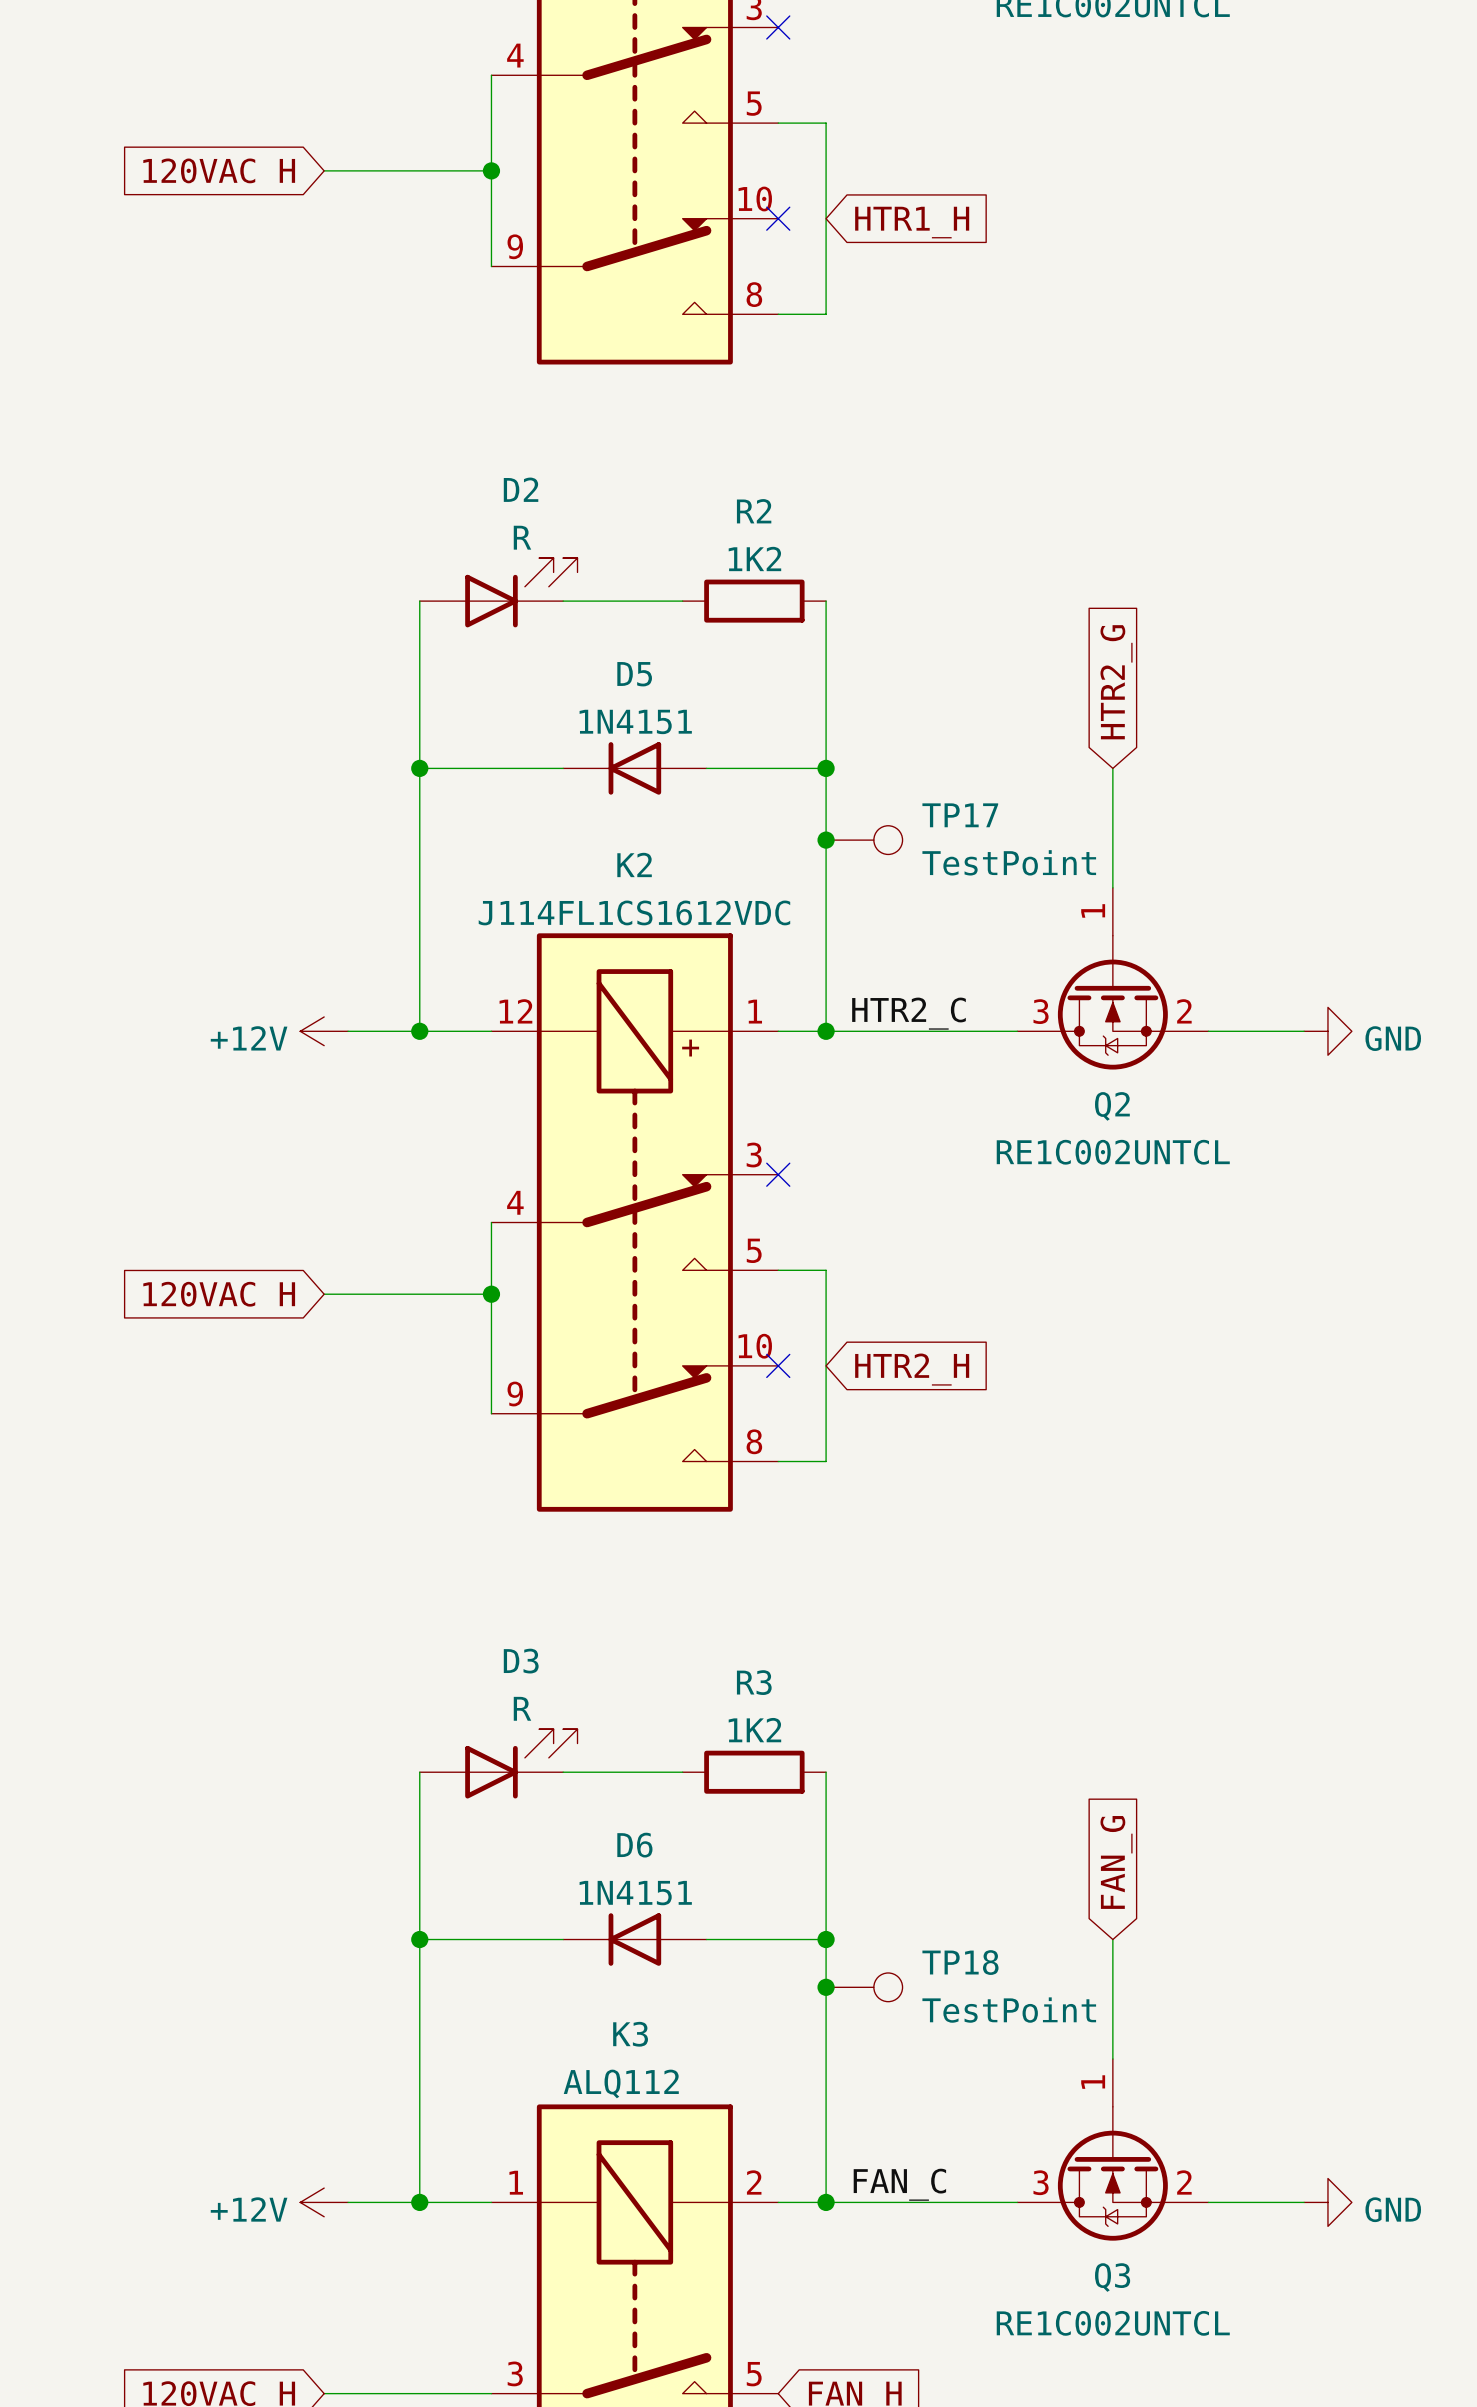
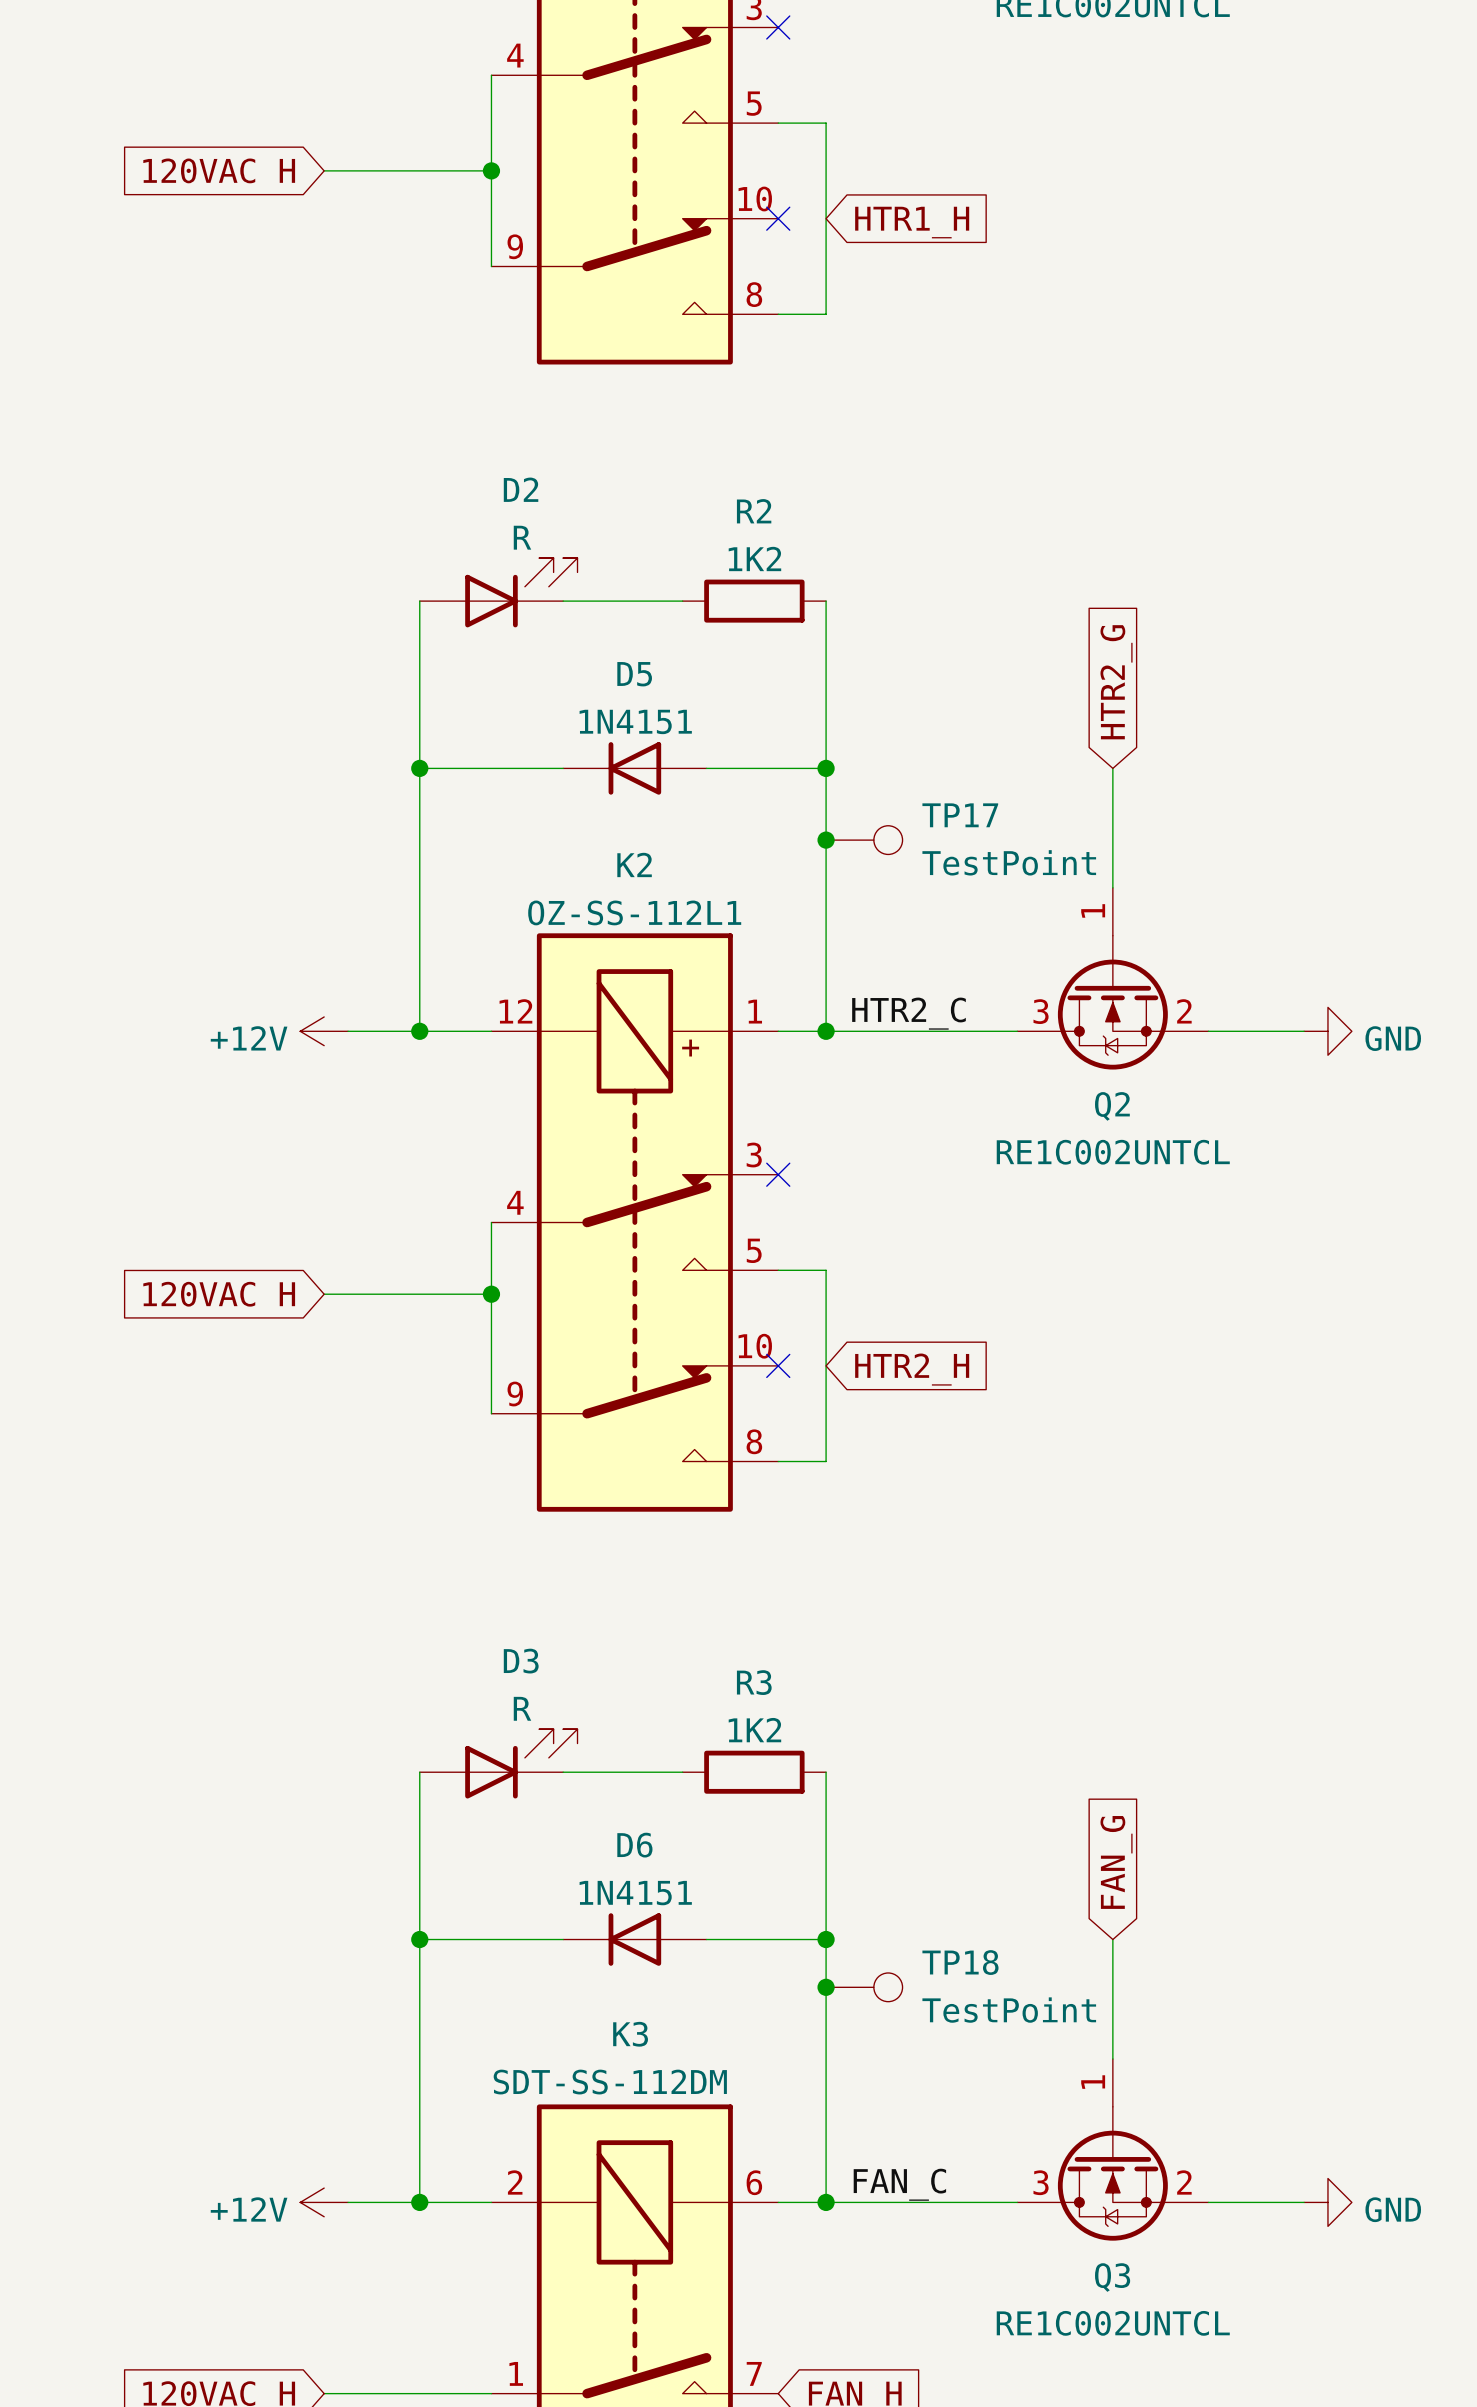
K2 value: J114FL1CS1612VDC (634, 912) -> OZ-SS-112L1 (634, 912)
K3 value: ALQ112 (621, 2083) -> SDT-SS-112DM (610, 2082)
K3 pin number: 1 (516, 2182) -> 2 (515, 2182)
K3 pin number: 2 (754, 2182) -> 6 (754, 2182)
K3 pin number: 3 (515, 2373) -> 1 (516, 2373)
K3 pin number: 5 (754, 2374) -> 7 (754, 2373)

